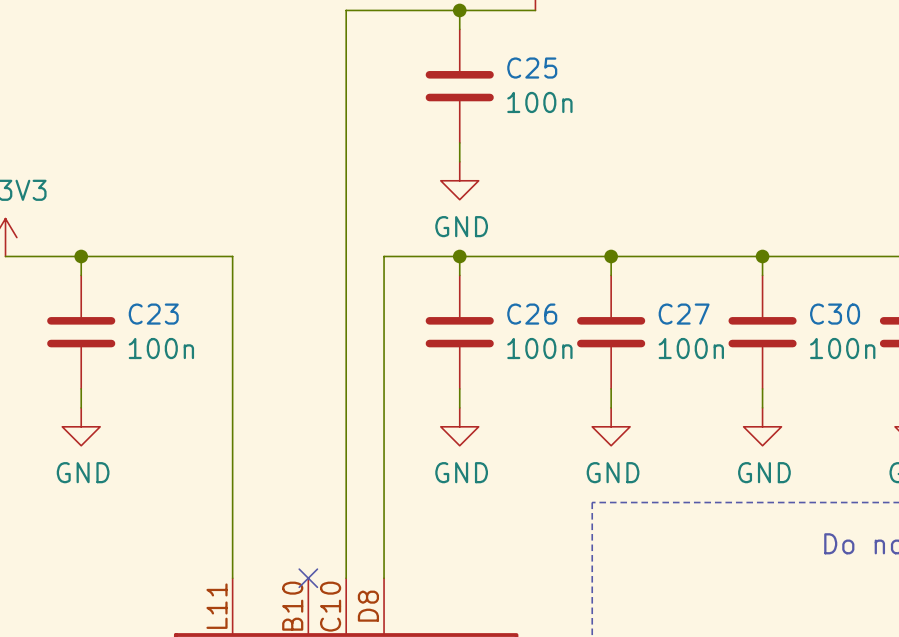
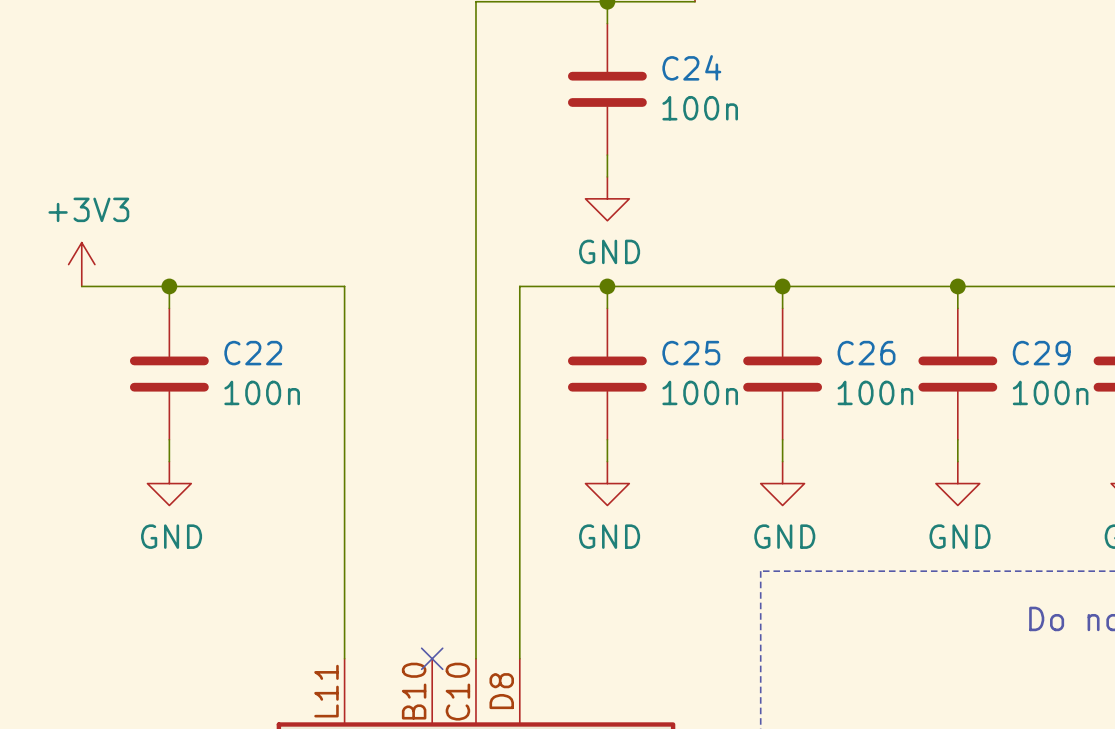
C25 name: C25 (532, 68) -> C24 (691, 67)
C23 name: C23 (153, 314) -> C22 (253, 353)
C26 name: C26 (532, 314) -> C25 (691, 353)
C27 name: C27 (684, 314) -> C26 (866, 353)
C30 name: C30 (835, 314) -> C29 (1041, 353)

